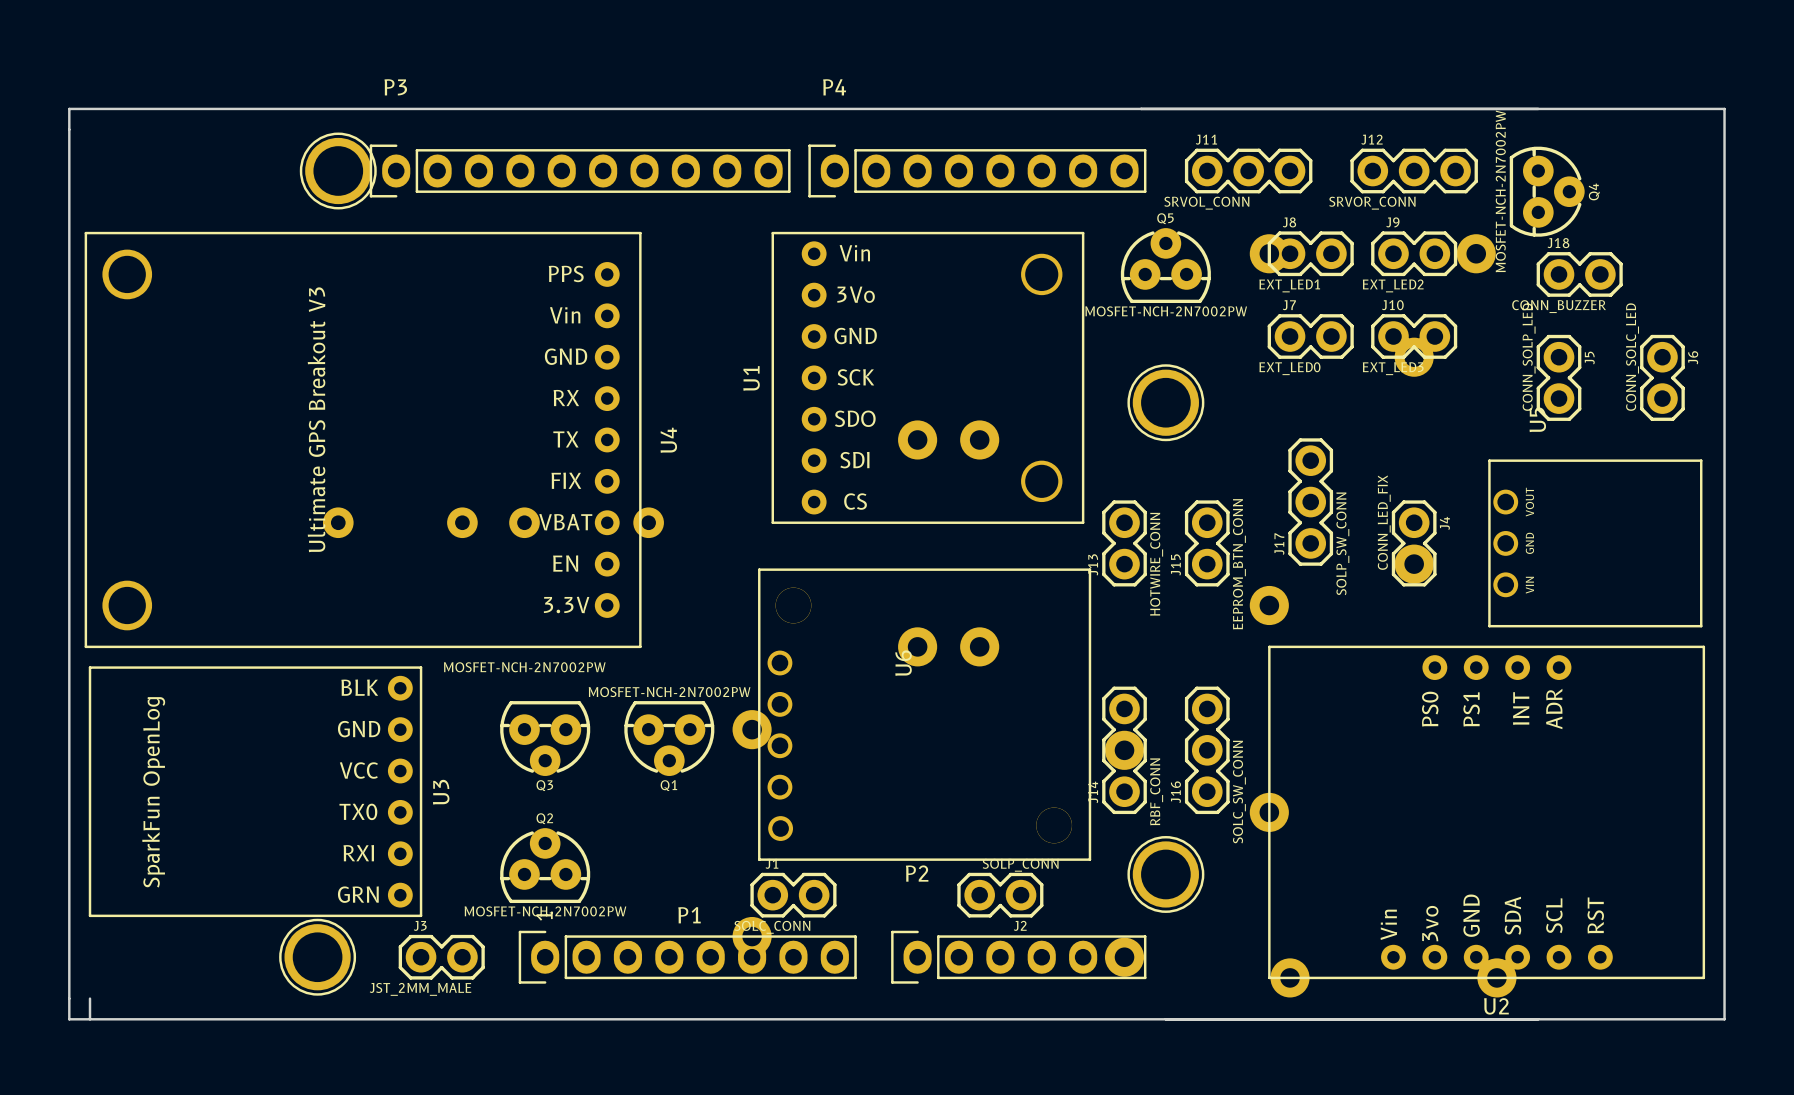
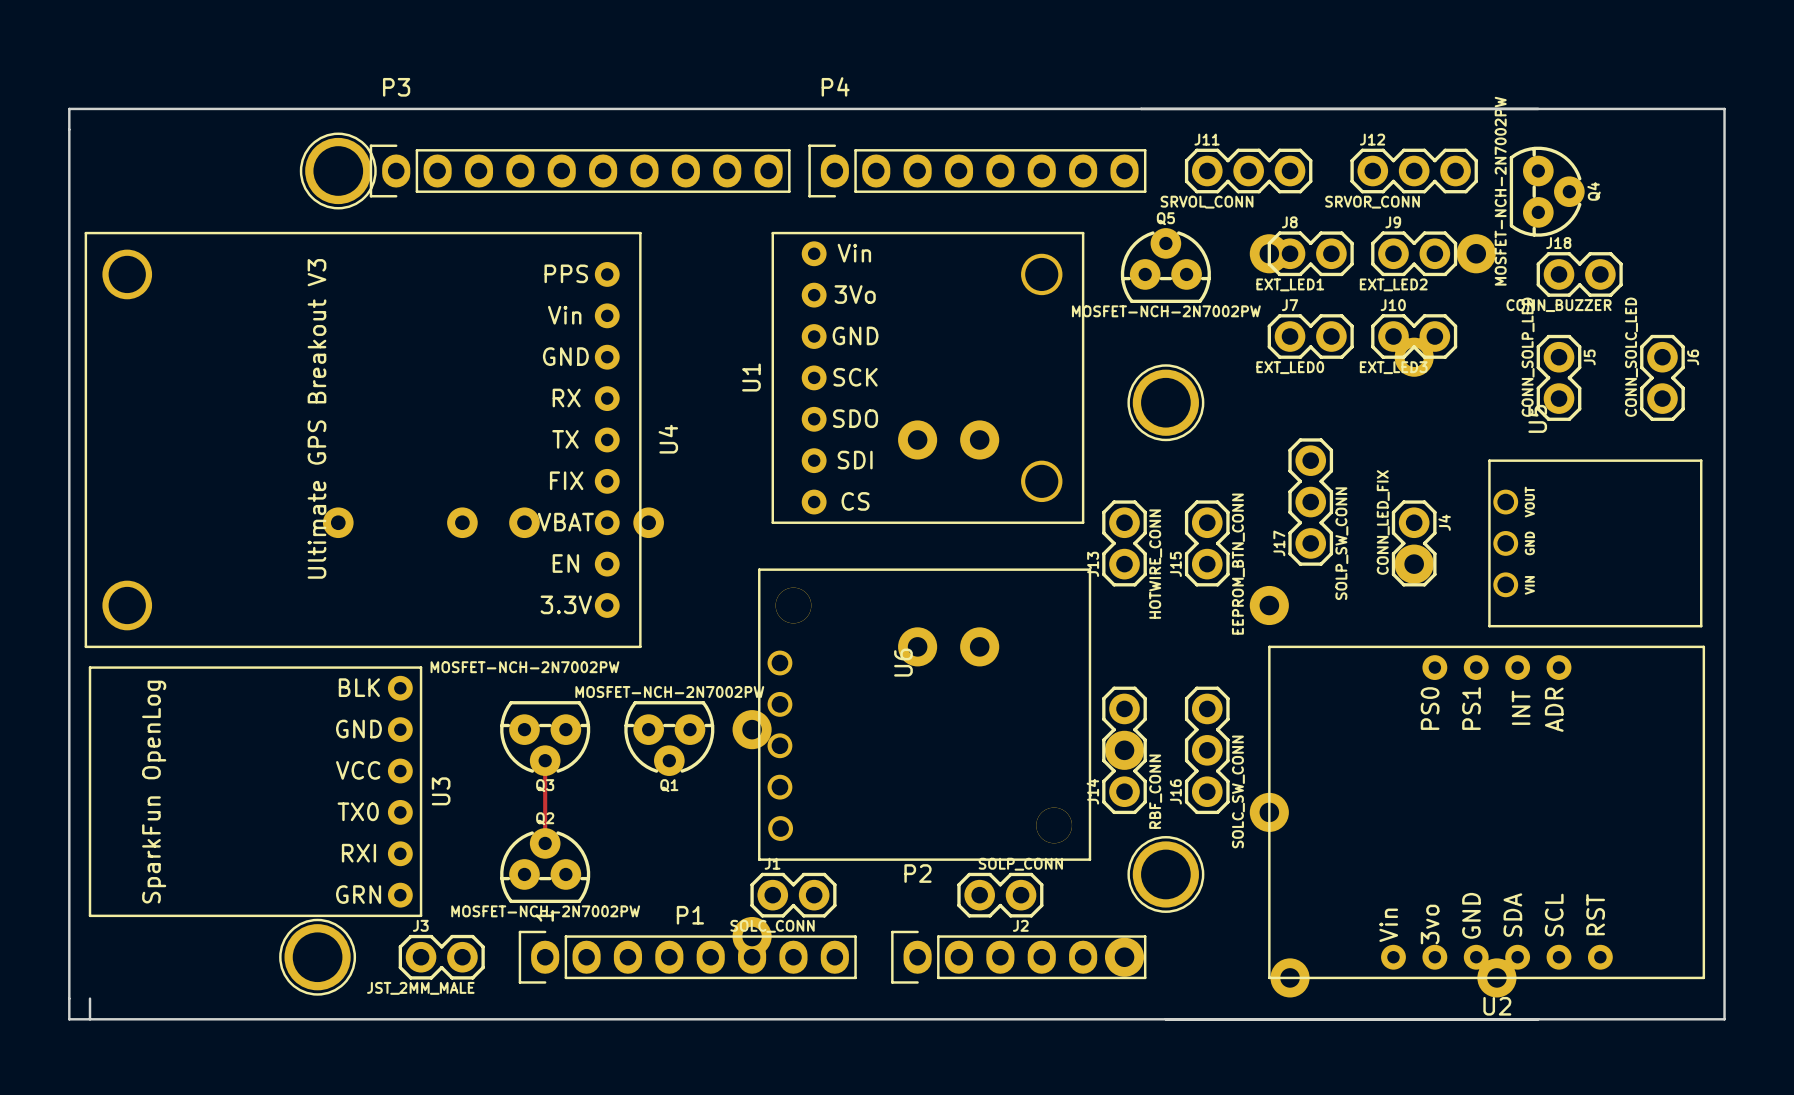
track: none -> (545, 760) (545, 843)

